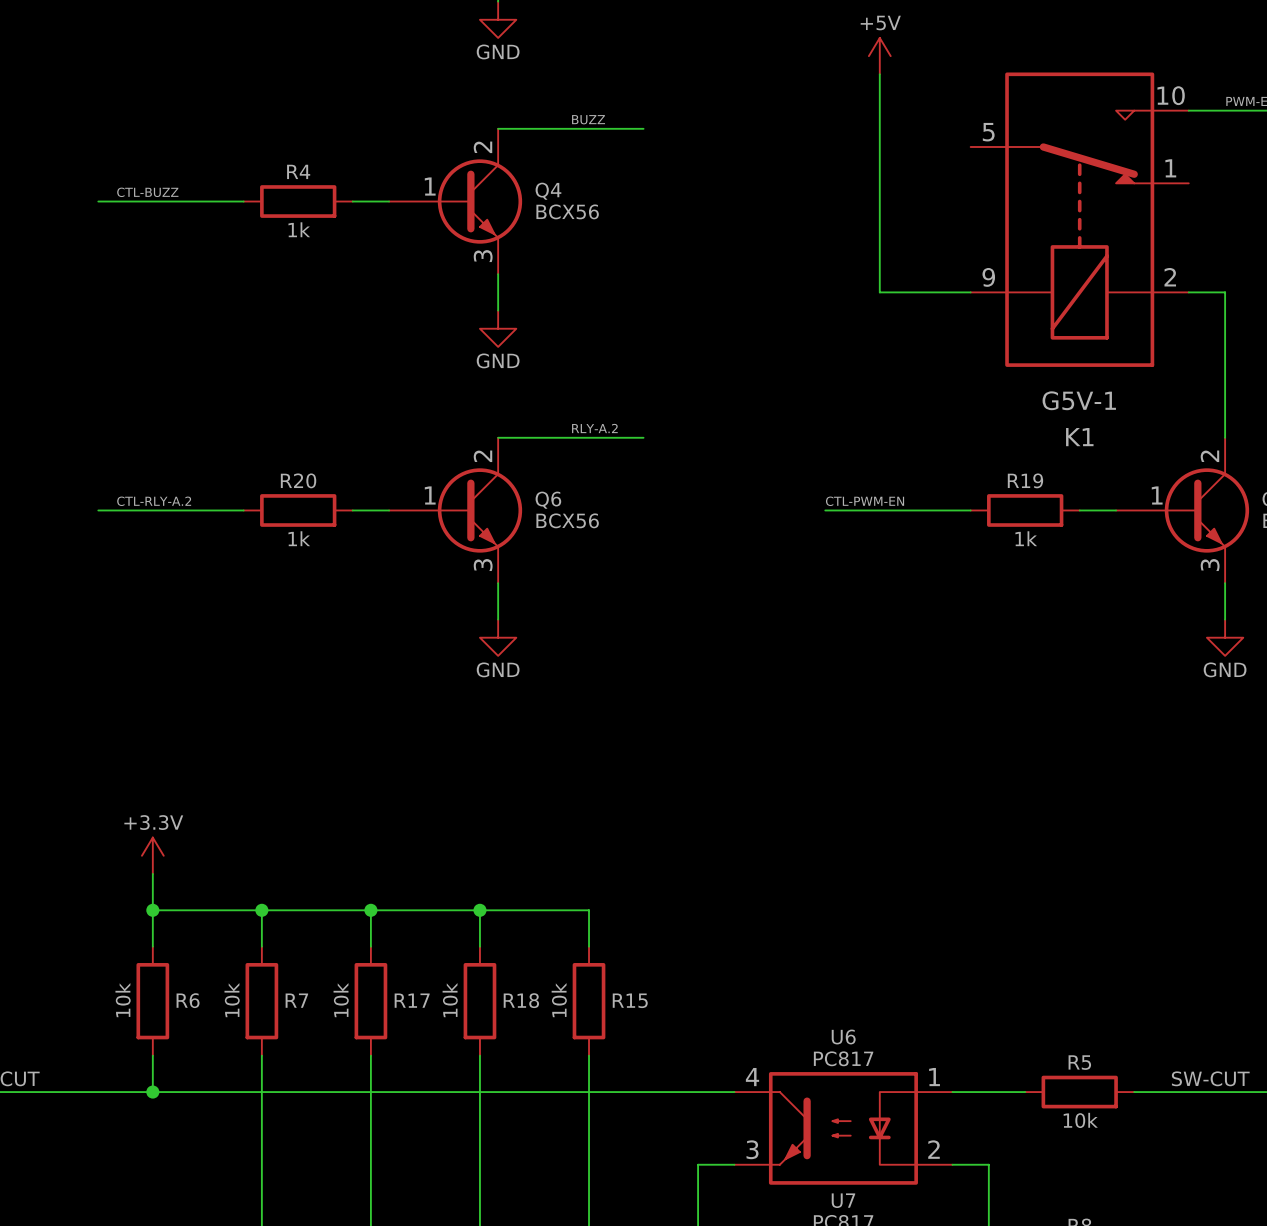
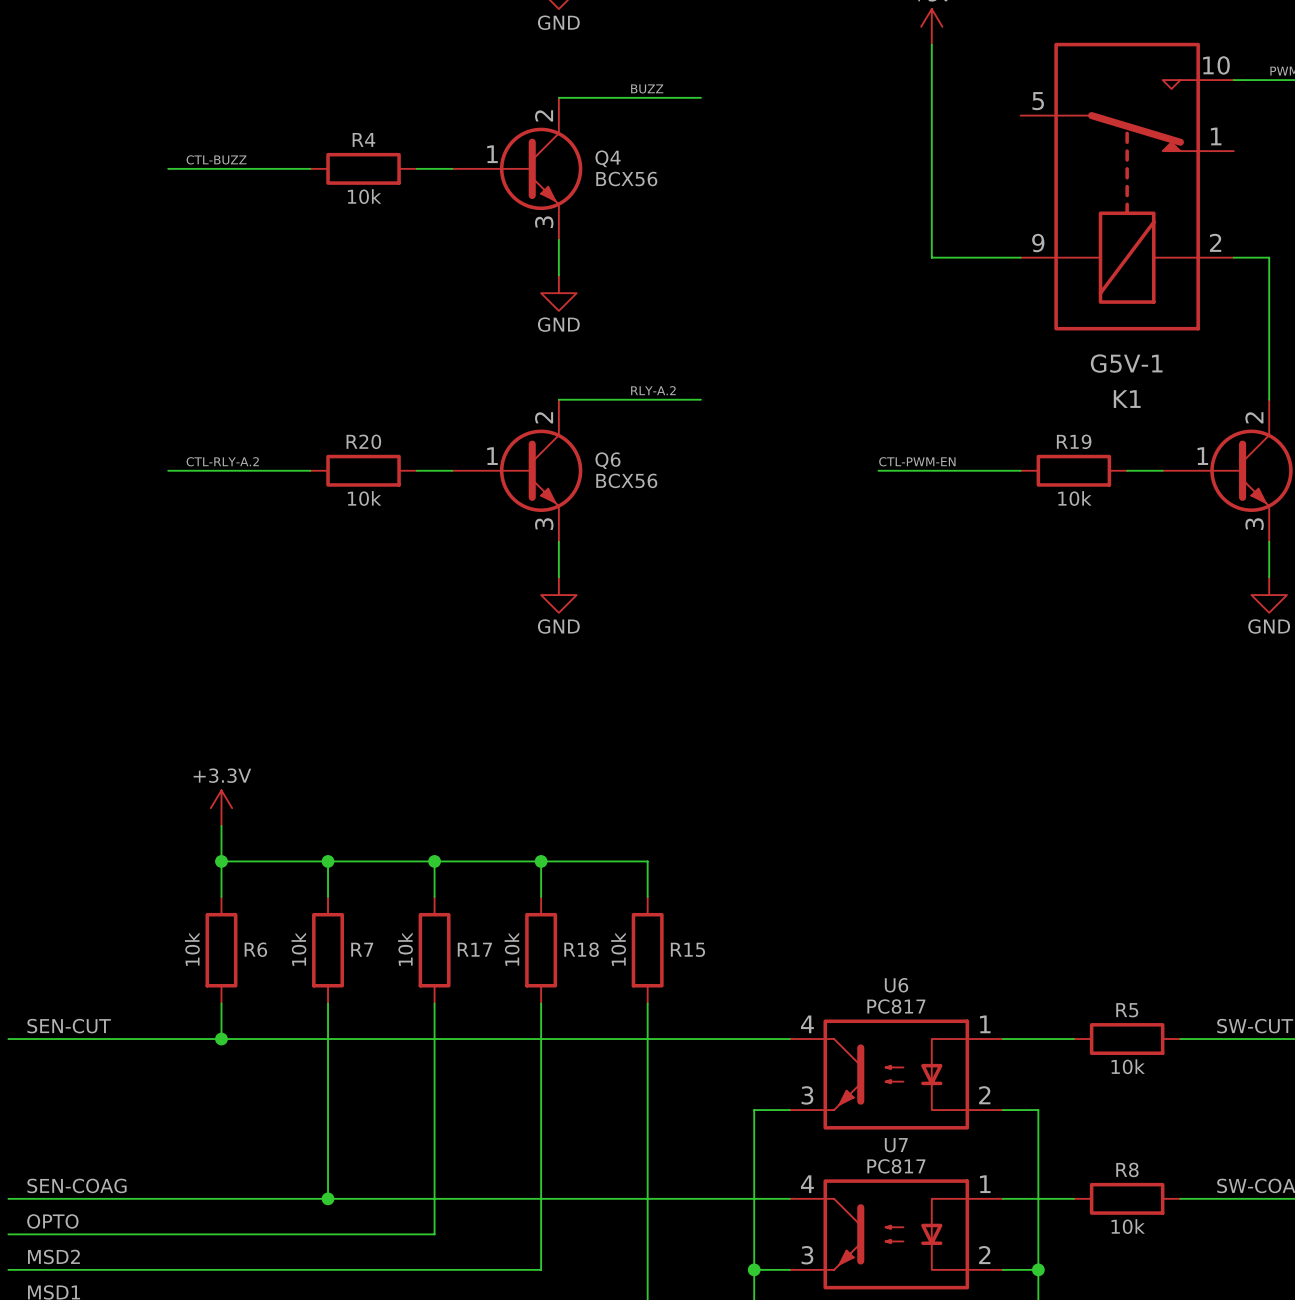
R4 value: 1k (299, 229) -> 10k (364, 196)
R20 value: 1k (299, 538) -> 10k (364, 498)
R19 value: 1k (1026, 538) -> 10k (1074, 498)

